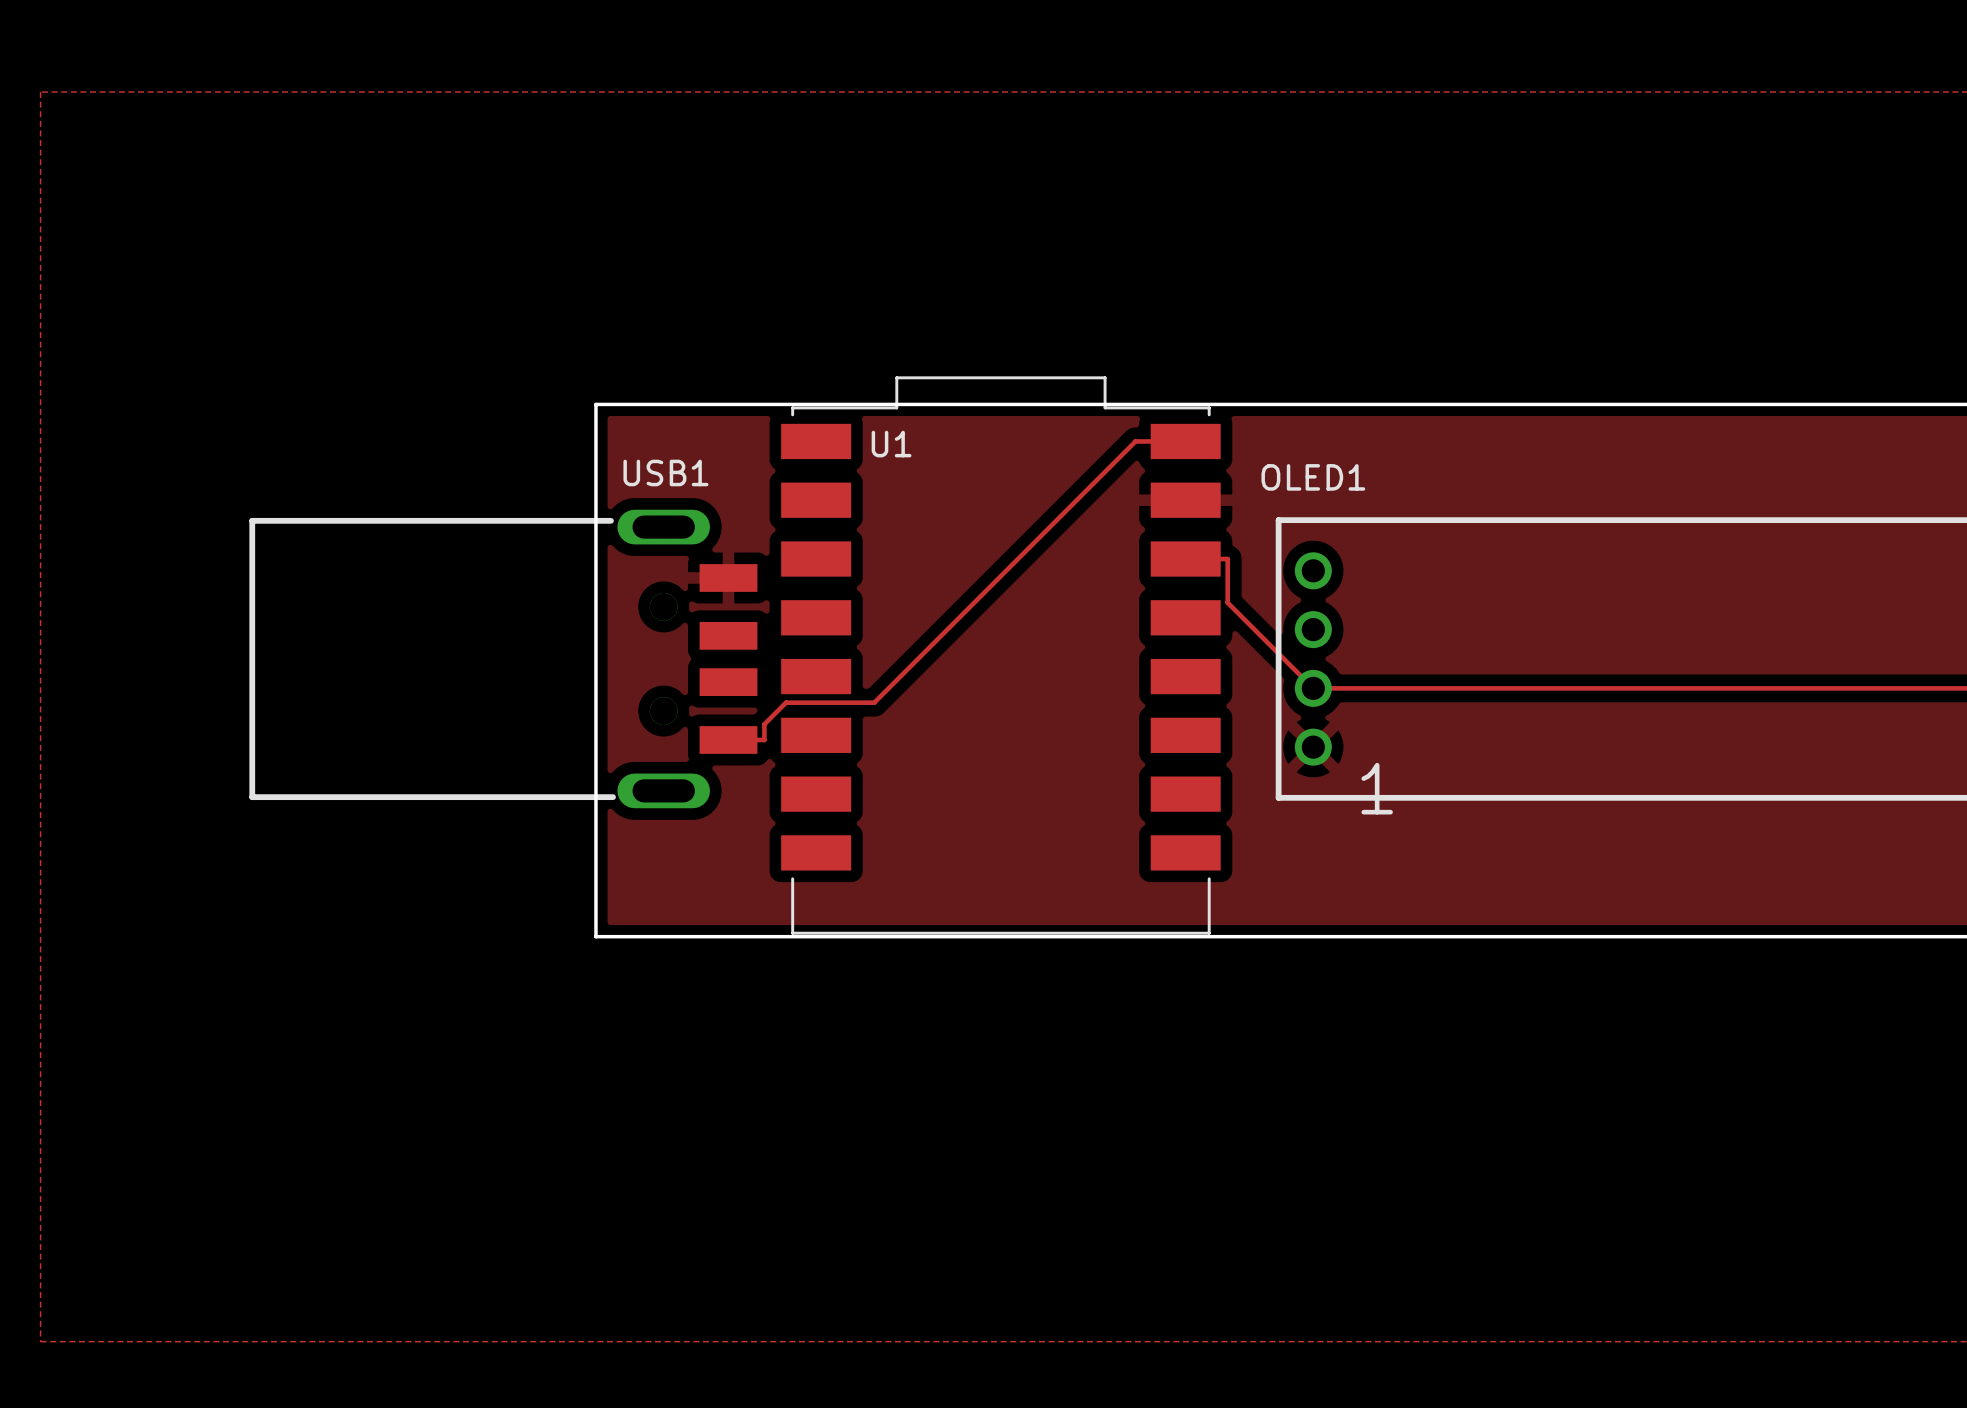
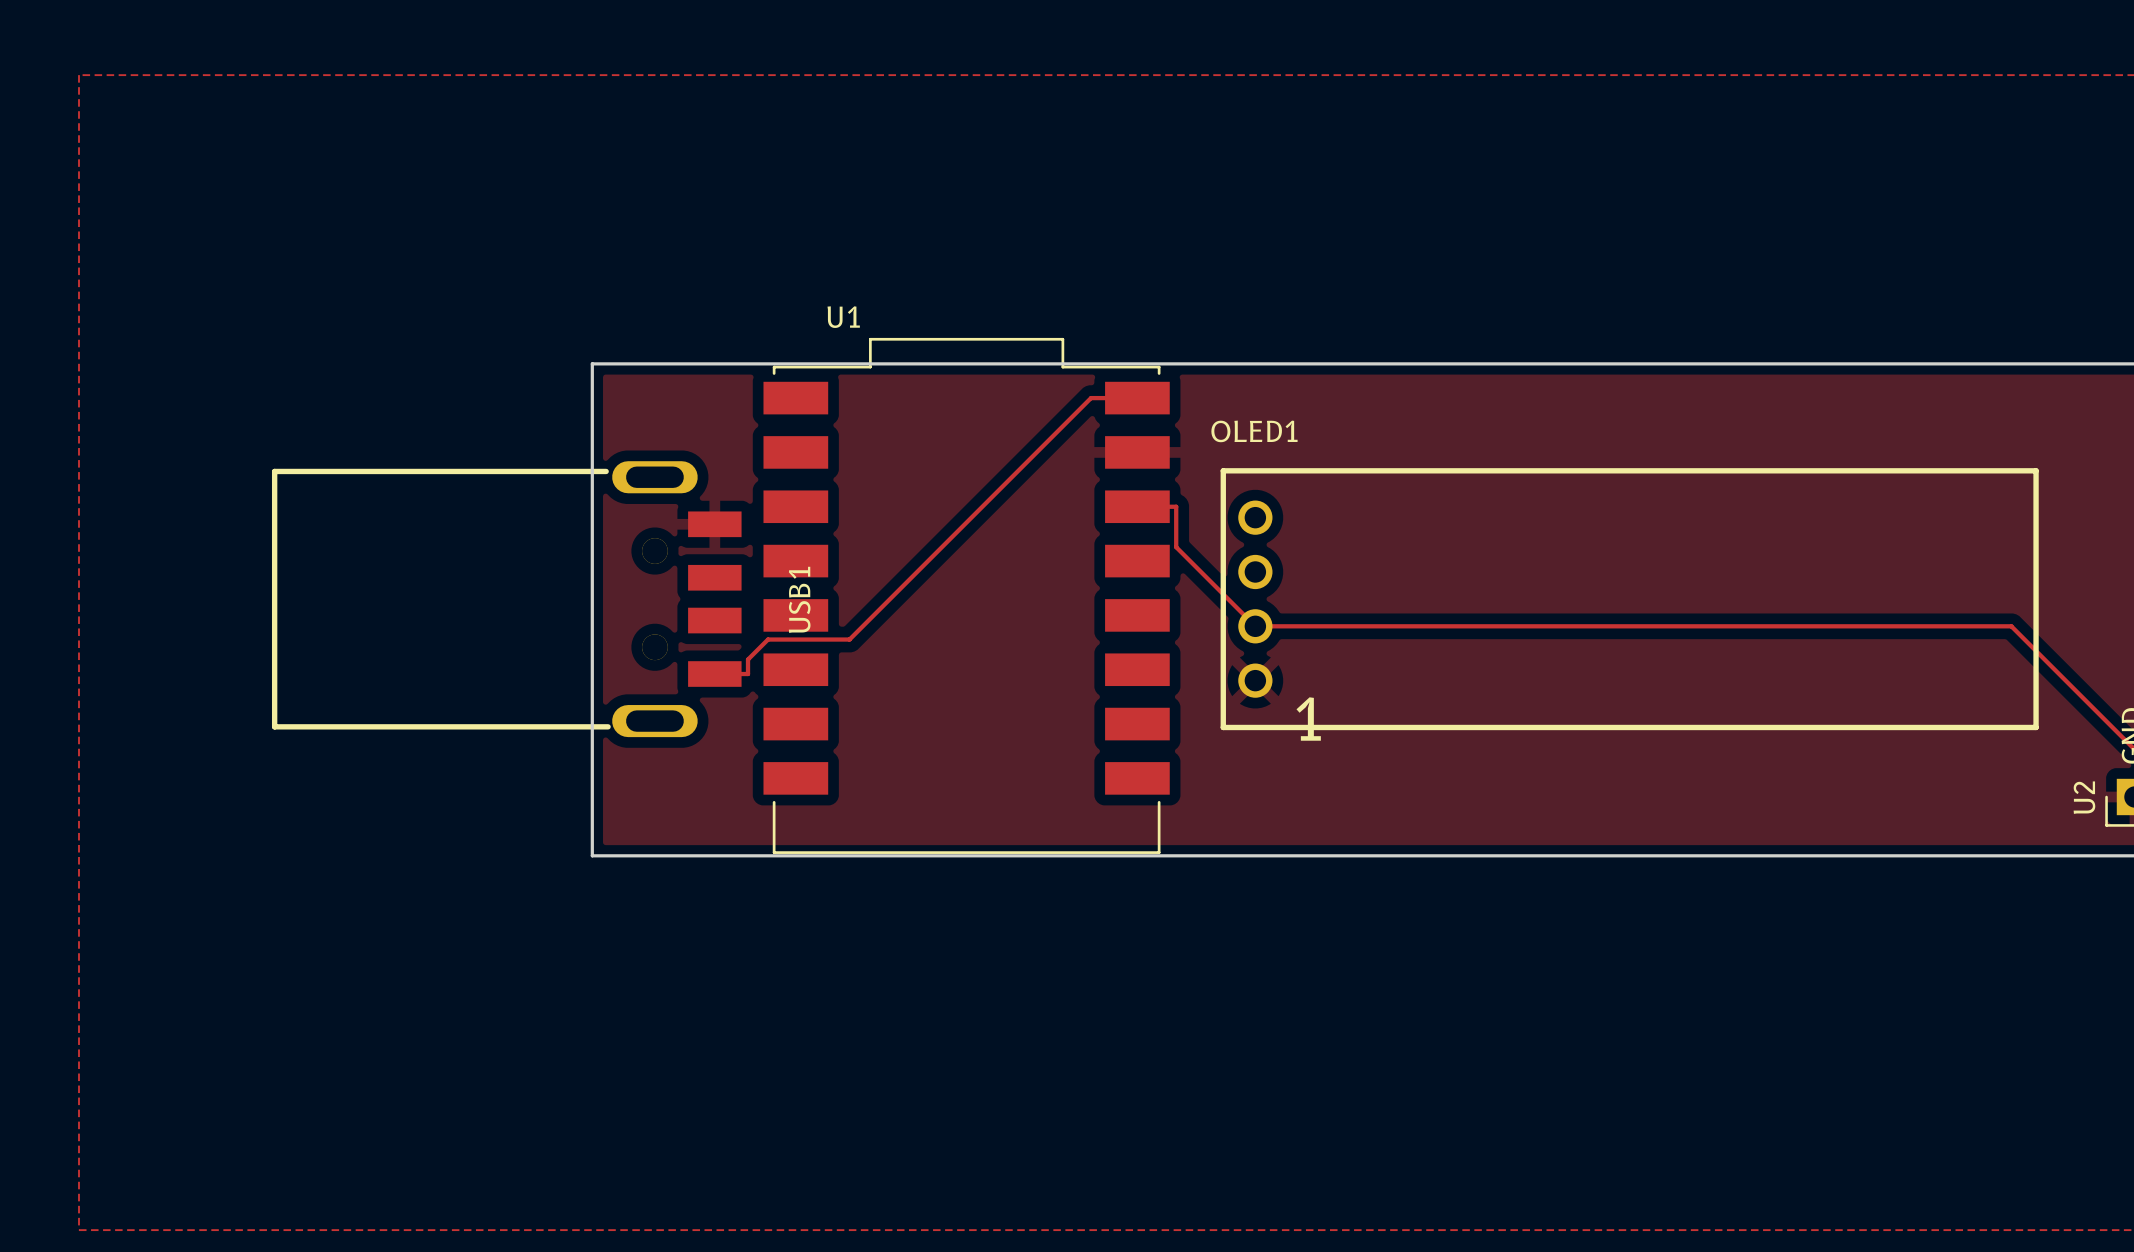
U1 name position: U1 (891, 444) -> U1 (843, 317)
USB1 name rotation: 0° (665, 472) -> 90° counterclockwise (799, 599)
USB1 name position: USB1 (665, 472) -> USB1 (799, 599)

